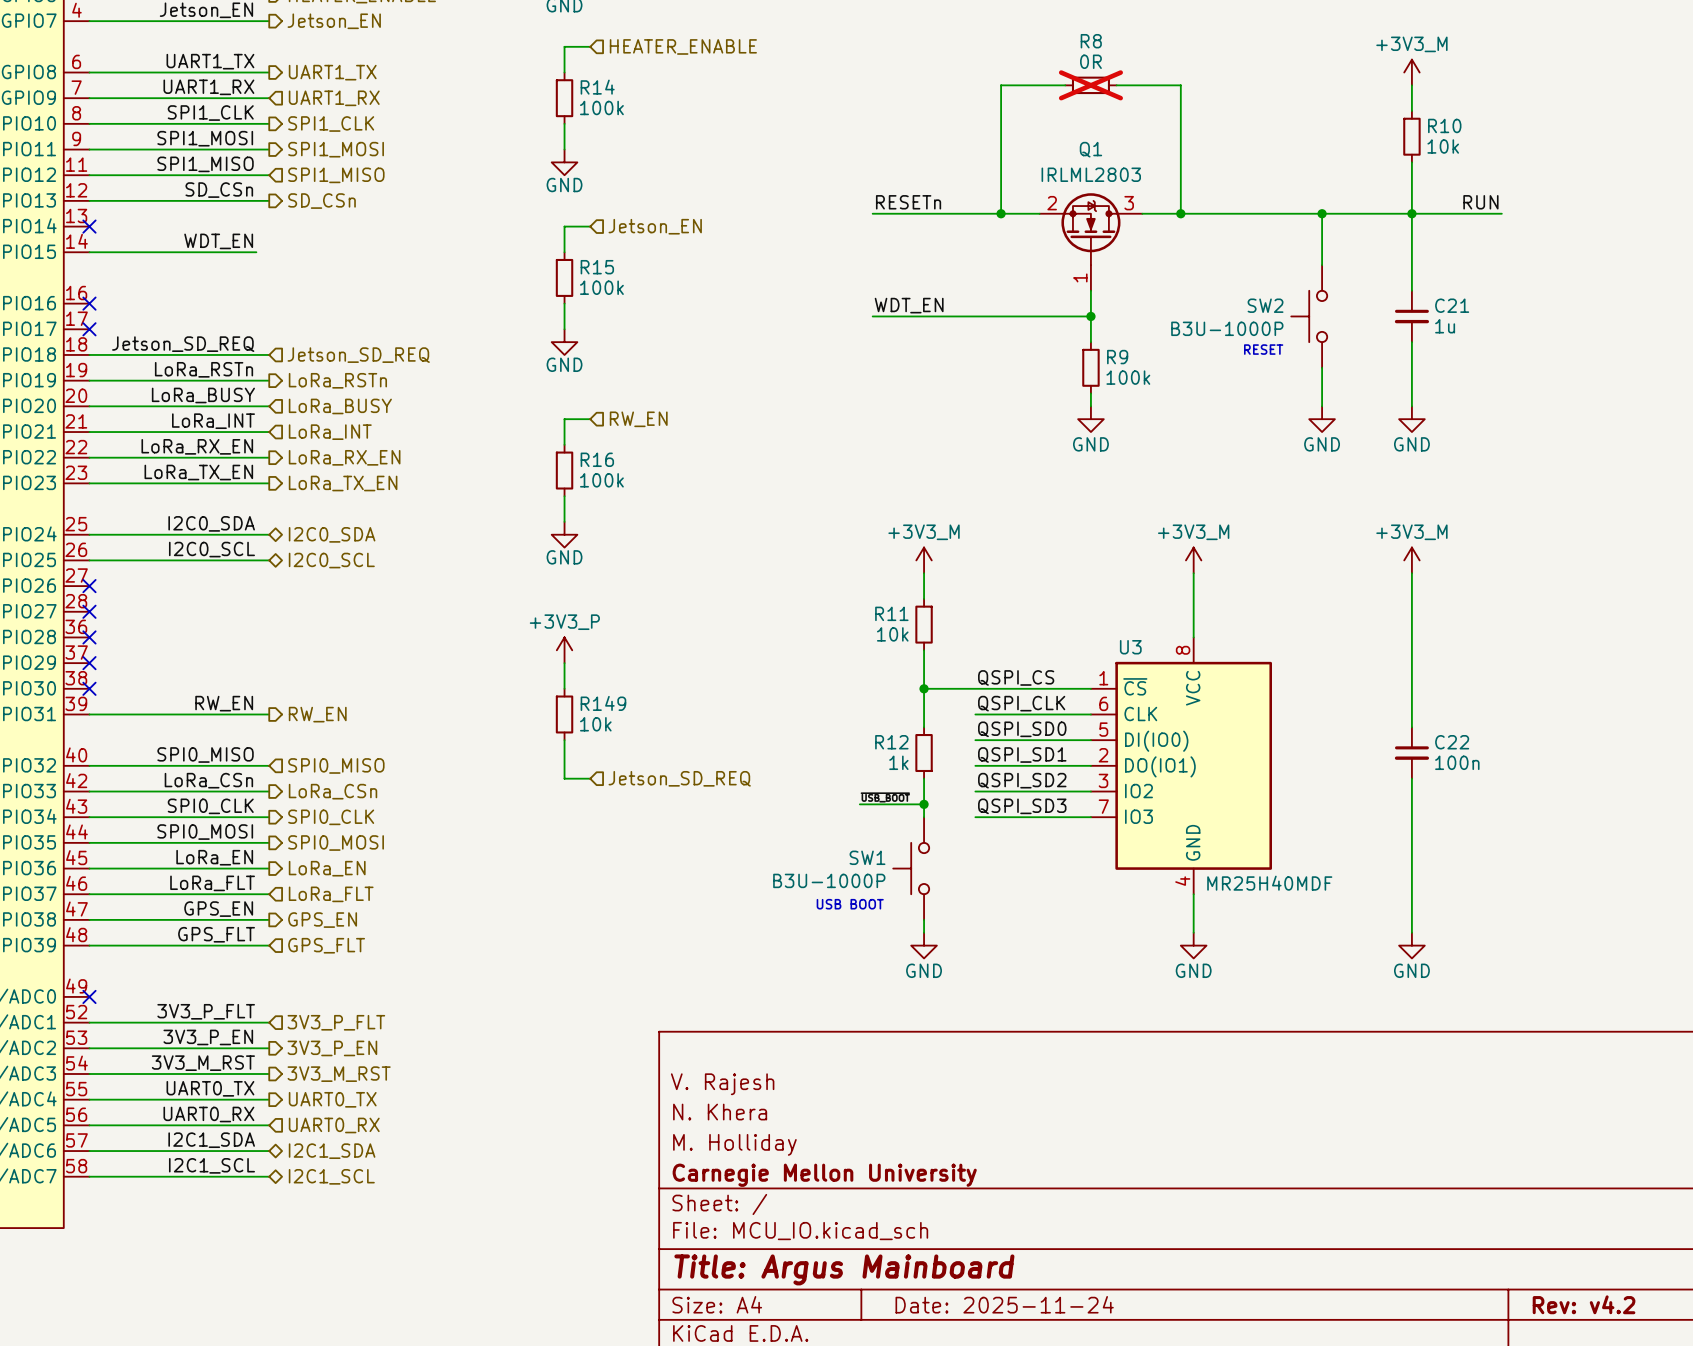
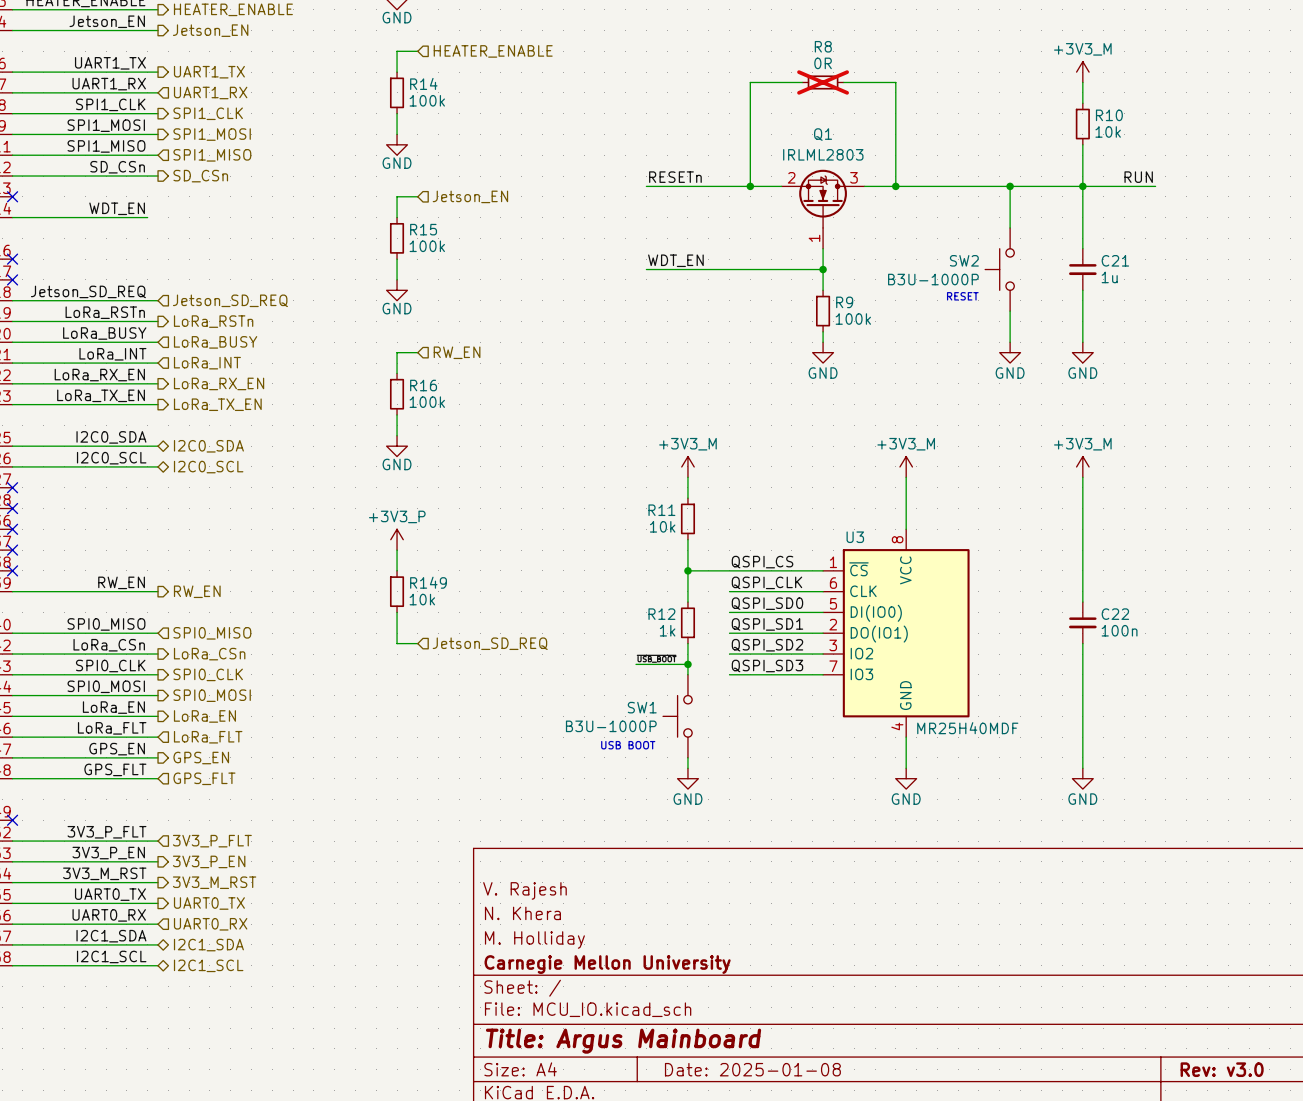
title block: Date: 2025-11-24 (1004, 1304) -> Date: 2025-01-08 (752, 1069)
title block: Rev: v4.2 (1584, 1304) -> Rev: v3.0 (1222, 1069)

